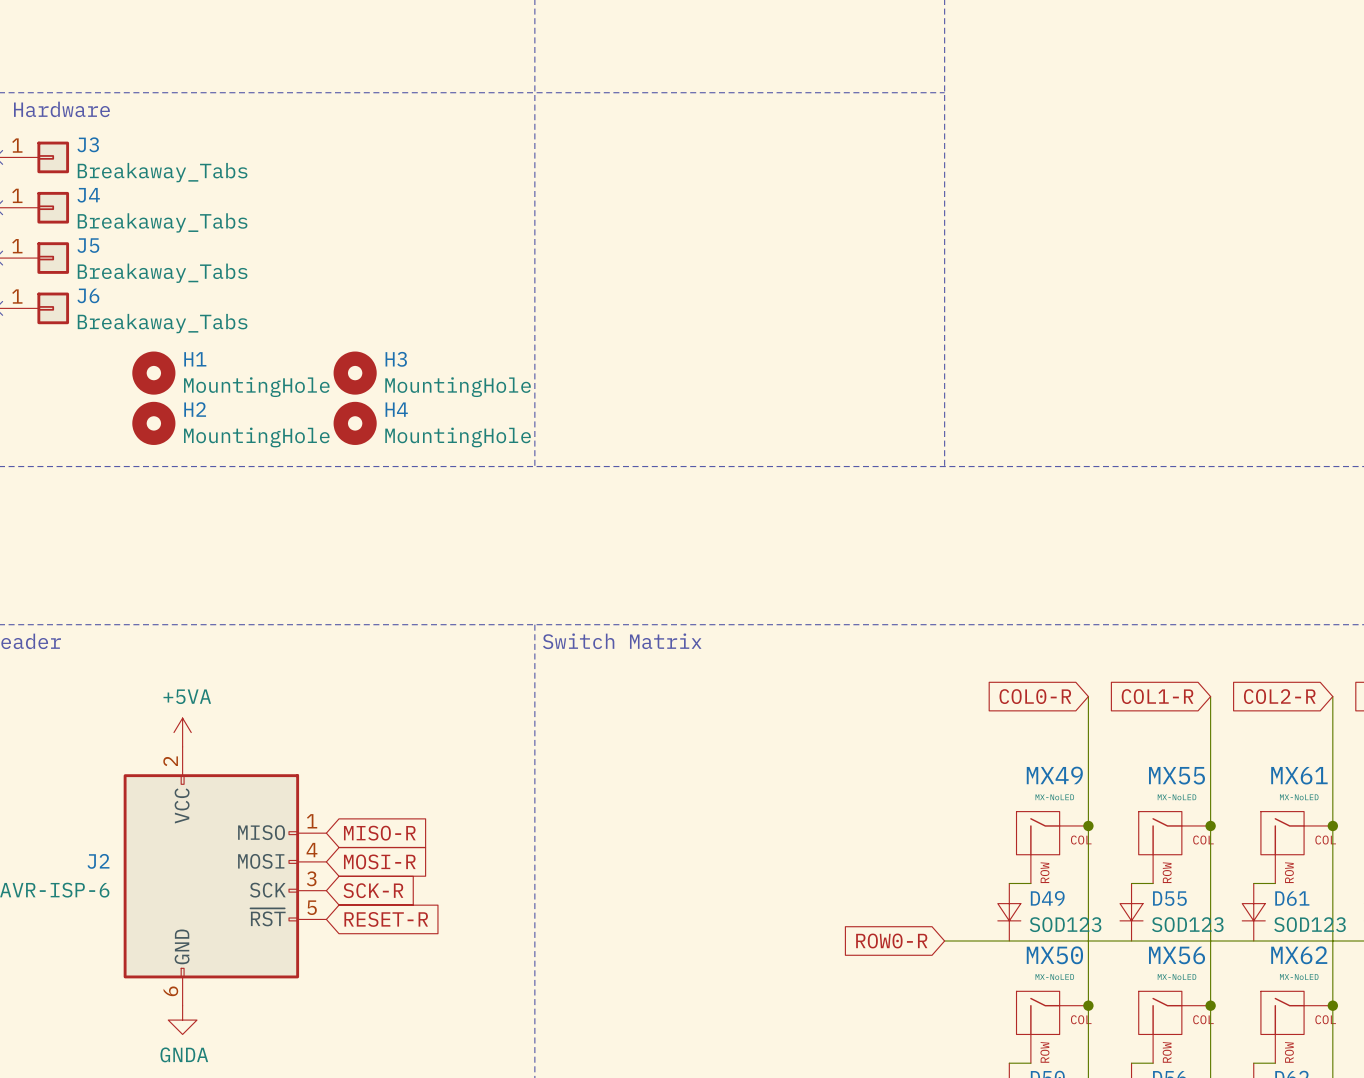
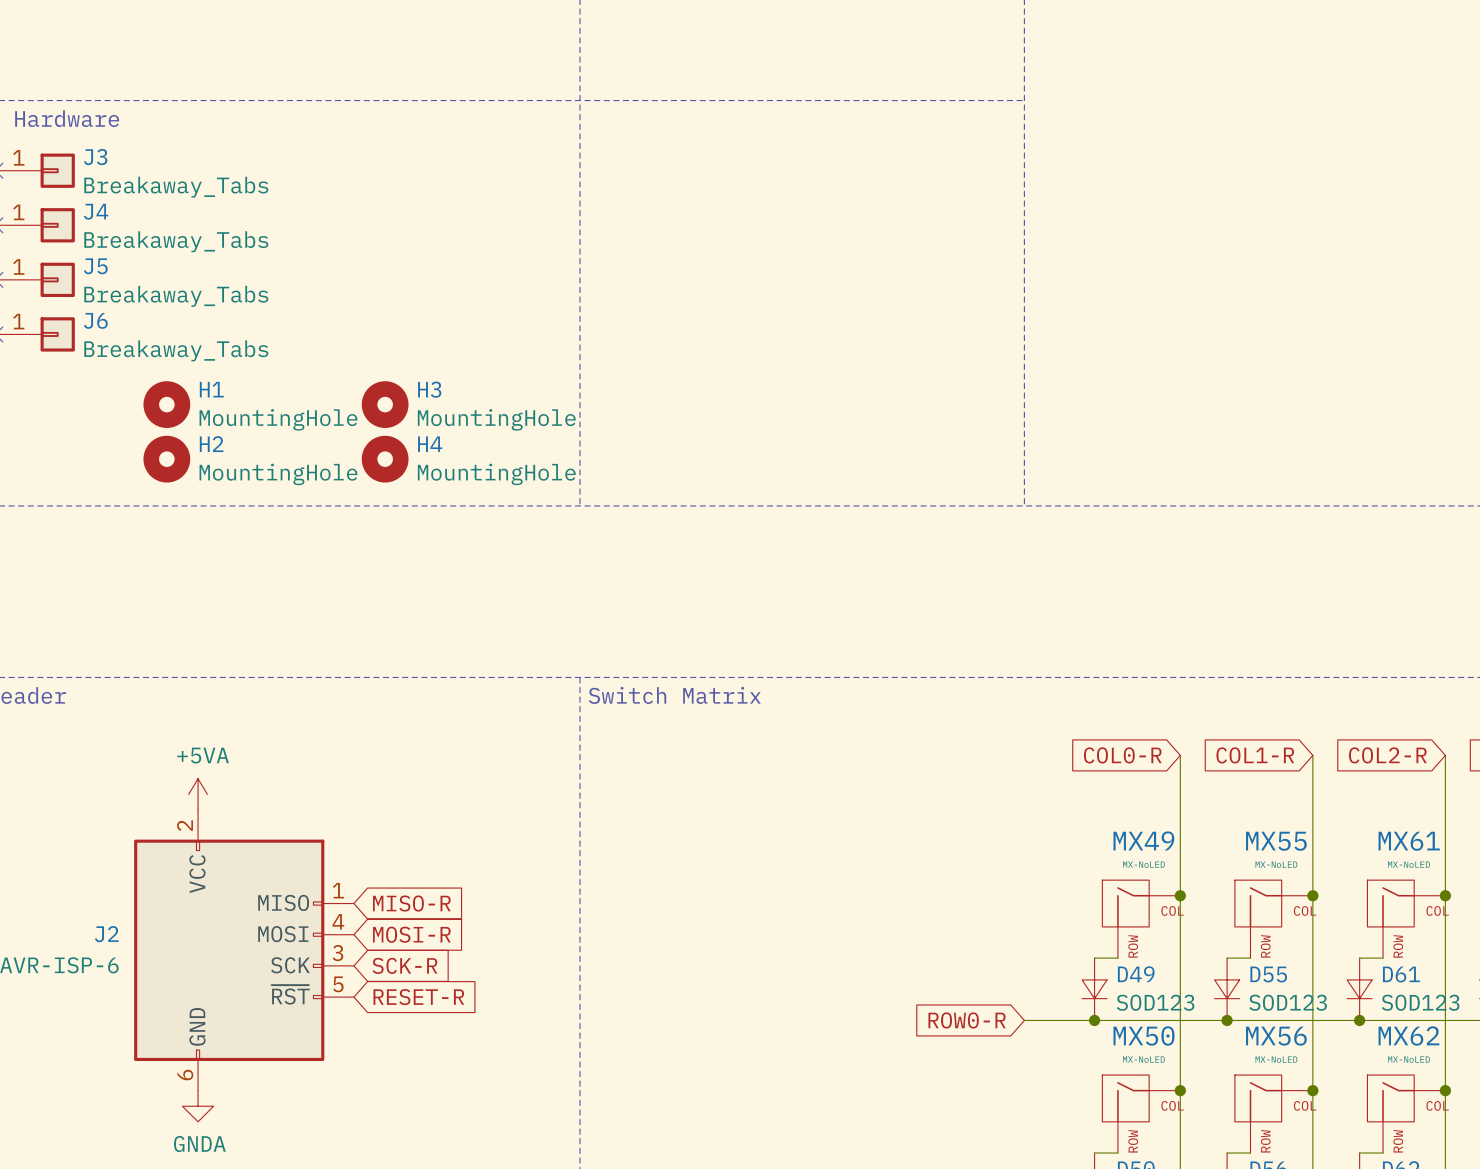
junction: none -> (1094, 1020)
junction: none -> (1227, 1020)
junction: none -> (1359, 1020)

